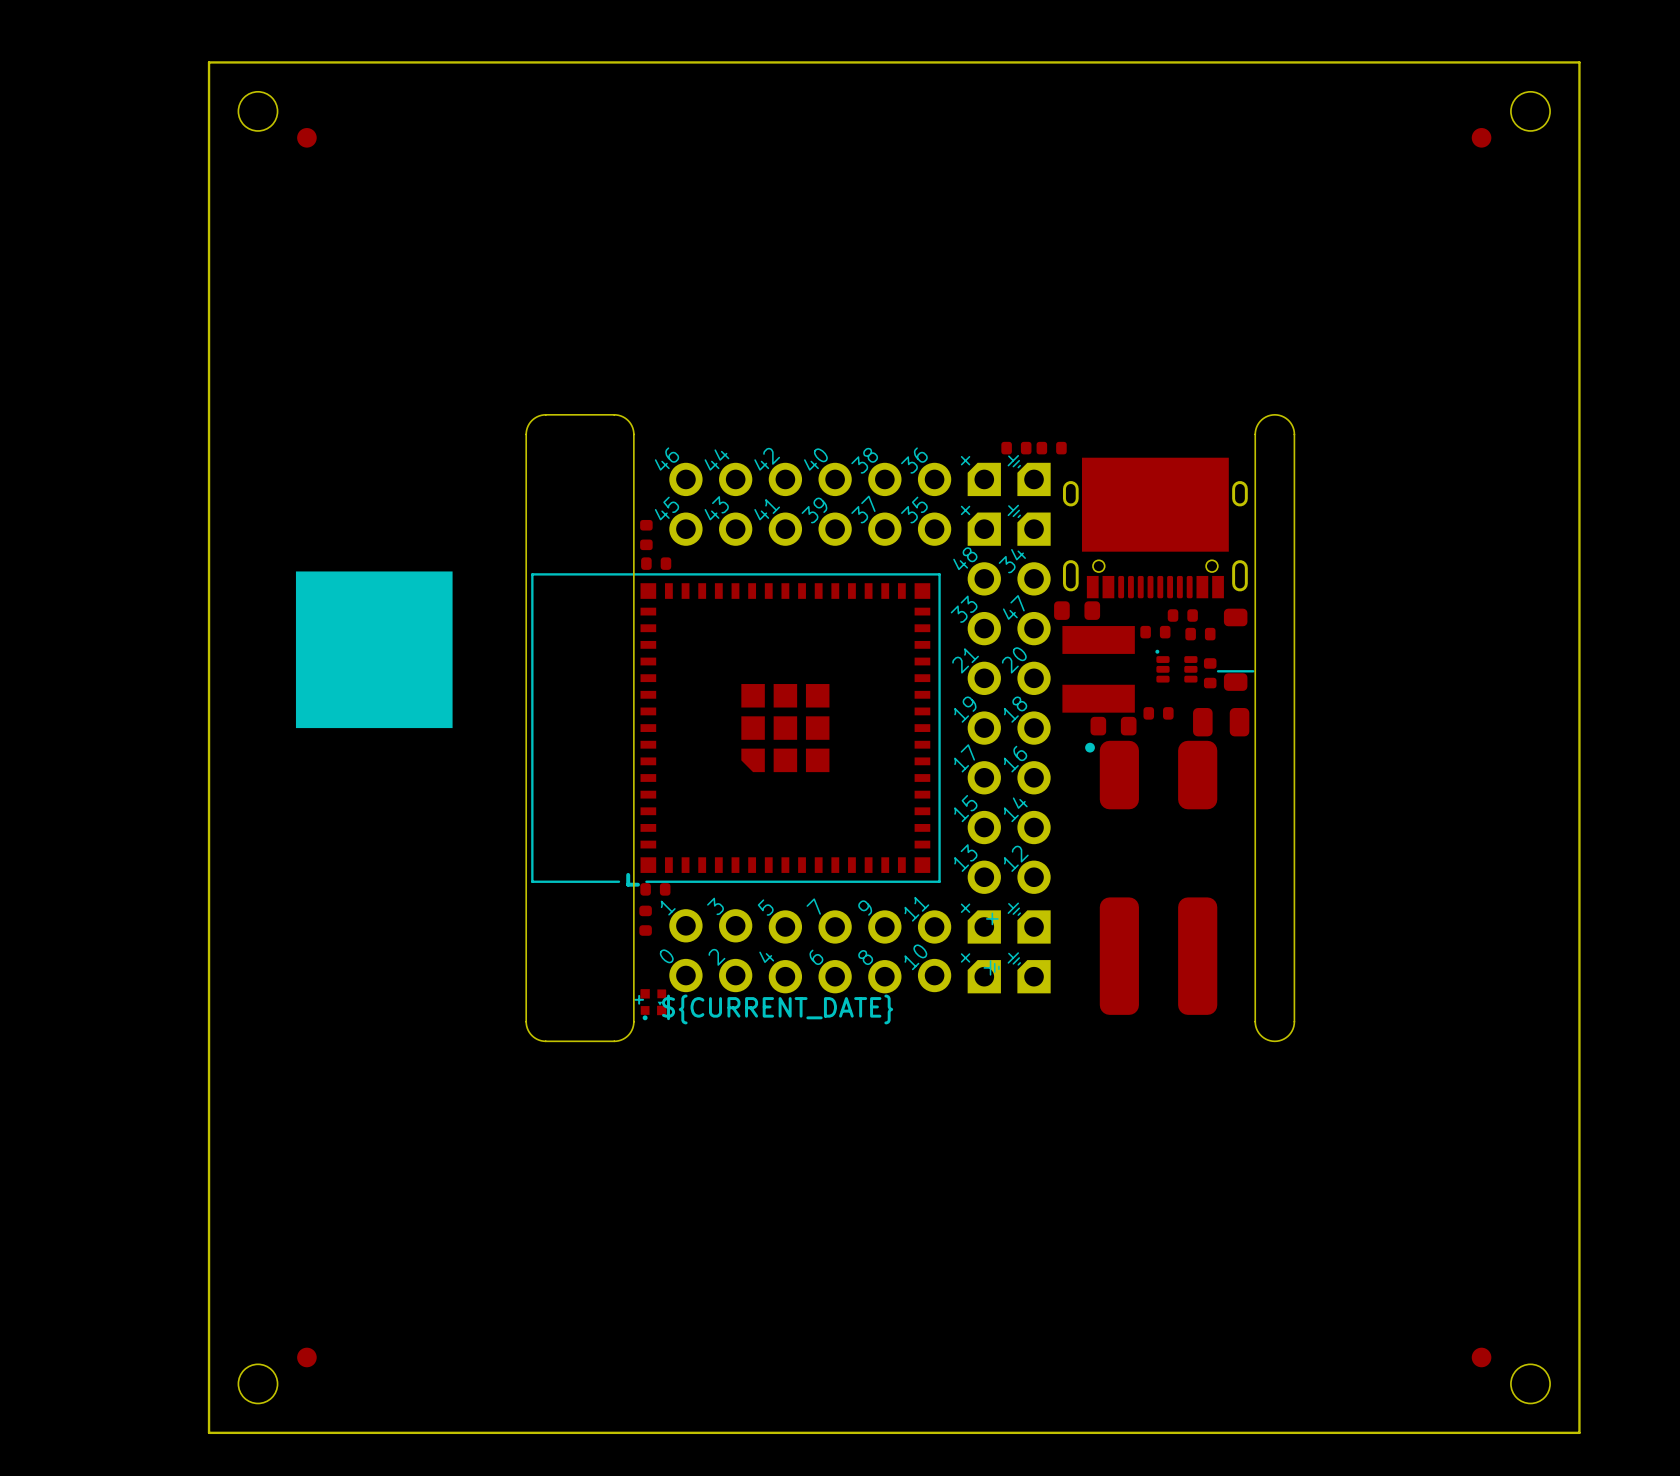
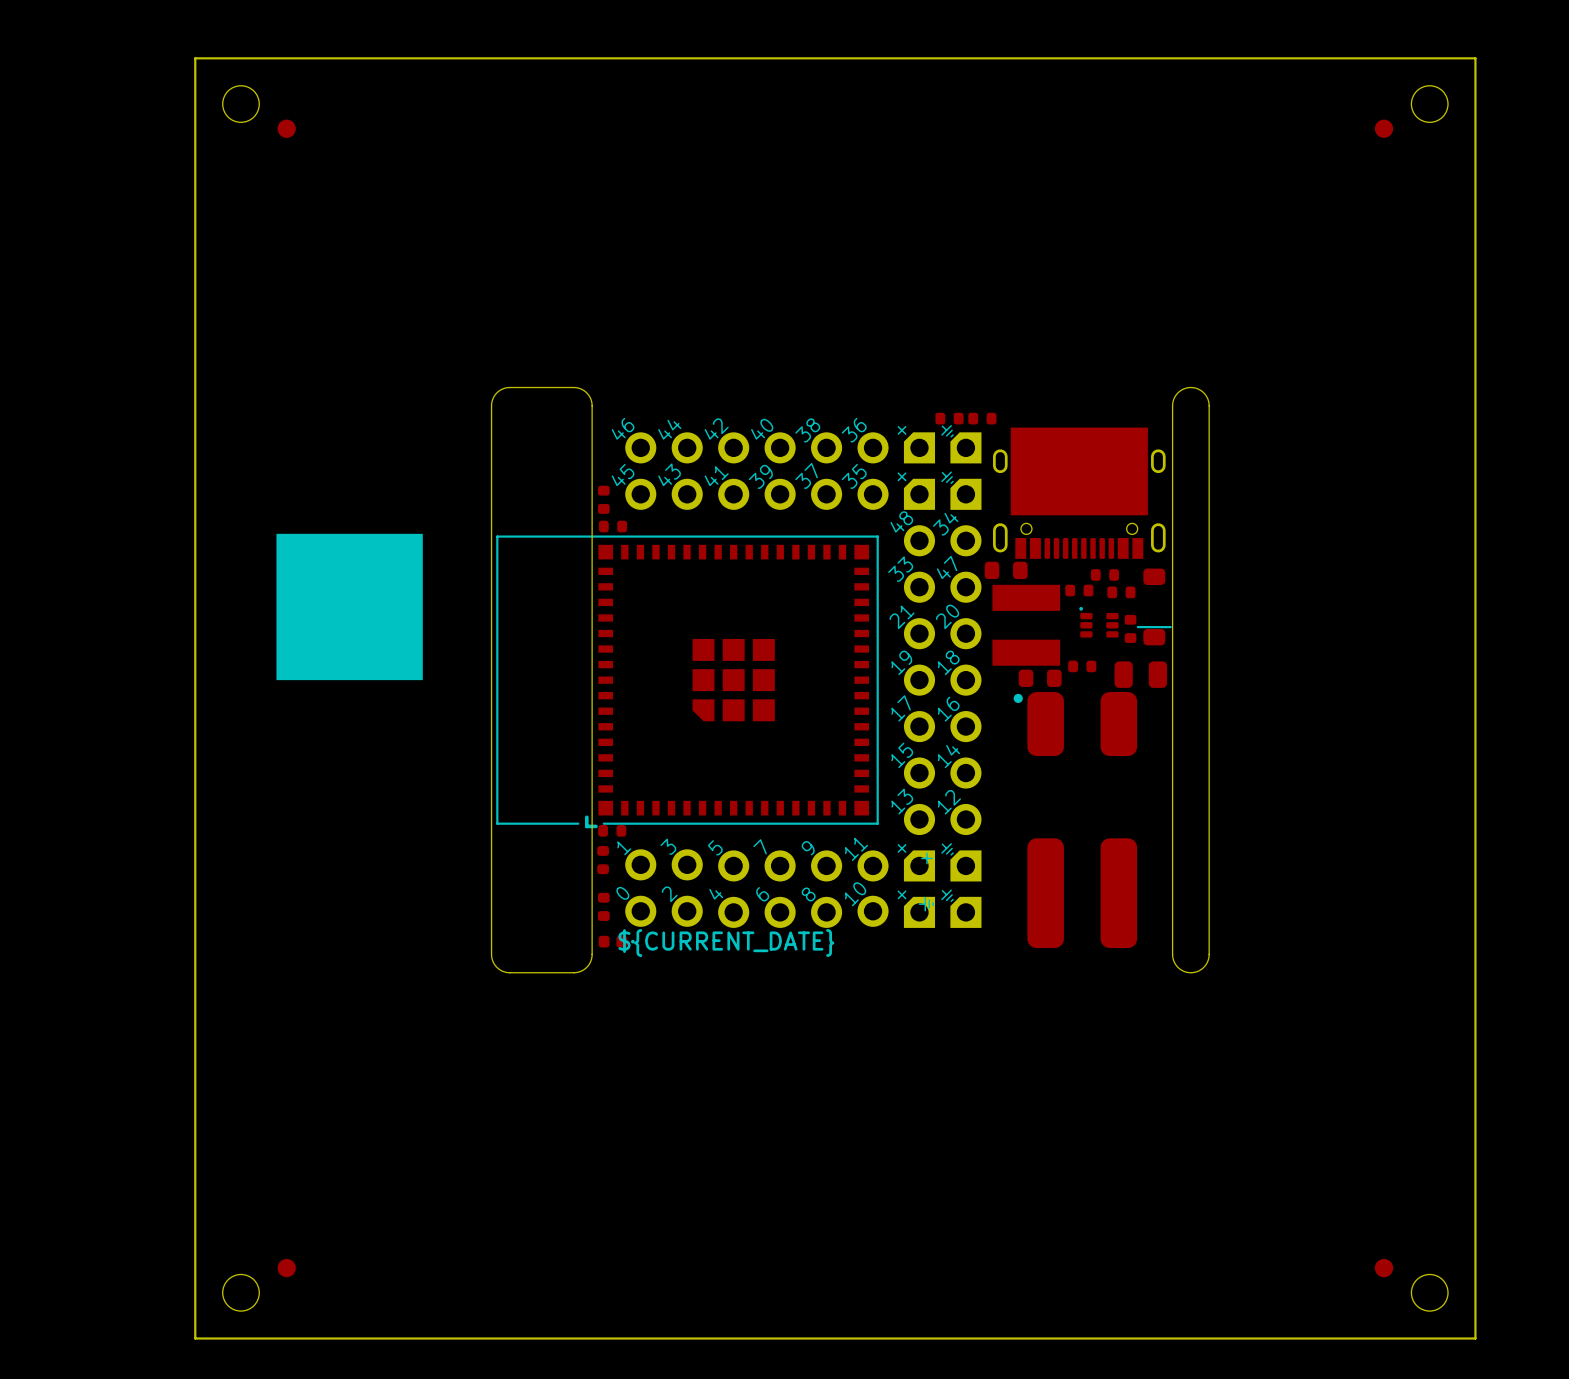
part: none -> (603, 906)
part footprint: [634, 989, 667, 1021] -> [598, 935, 635, 948]

